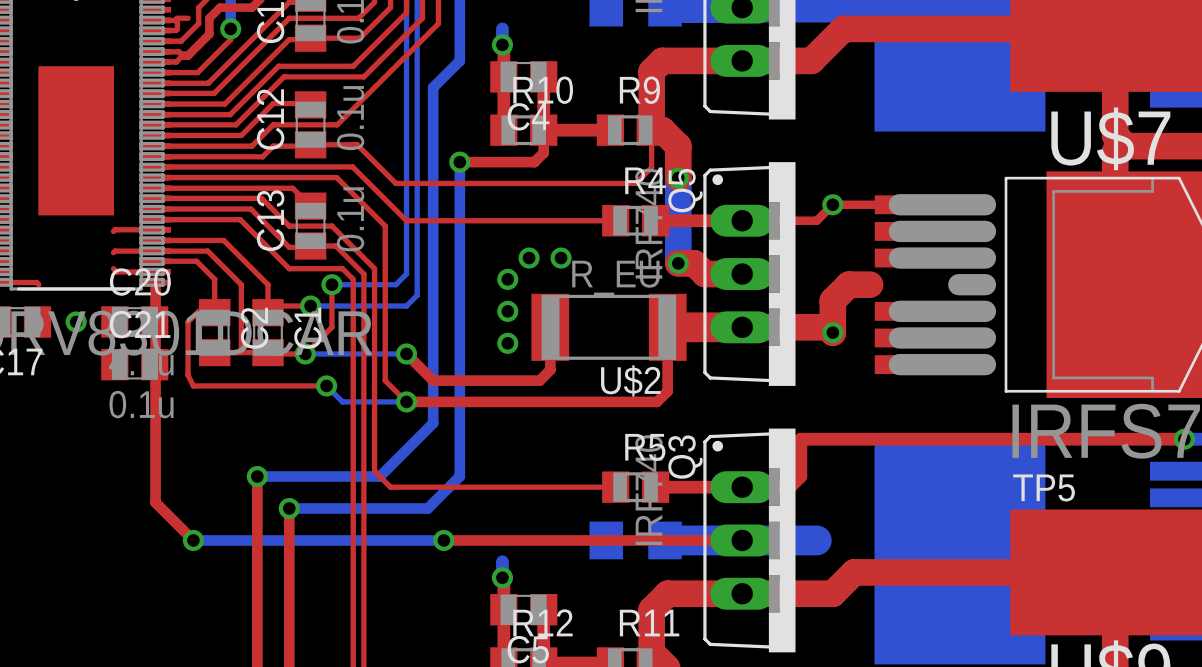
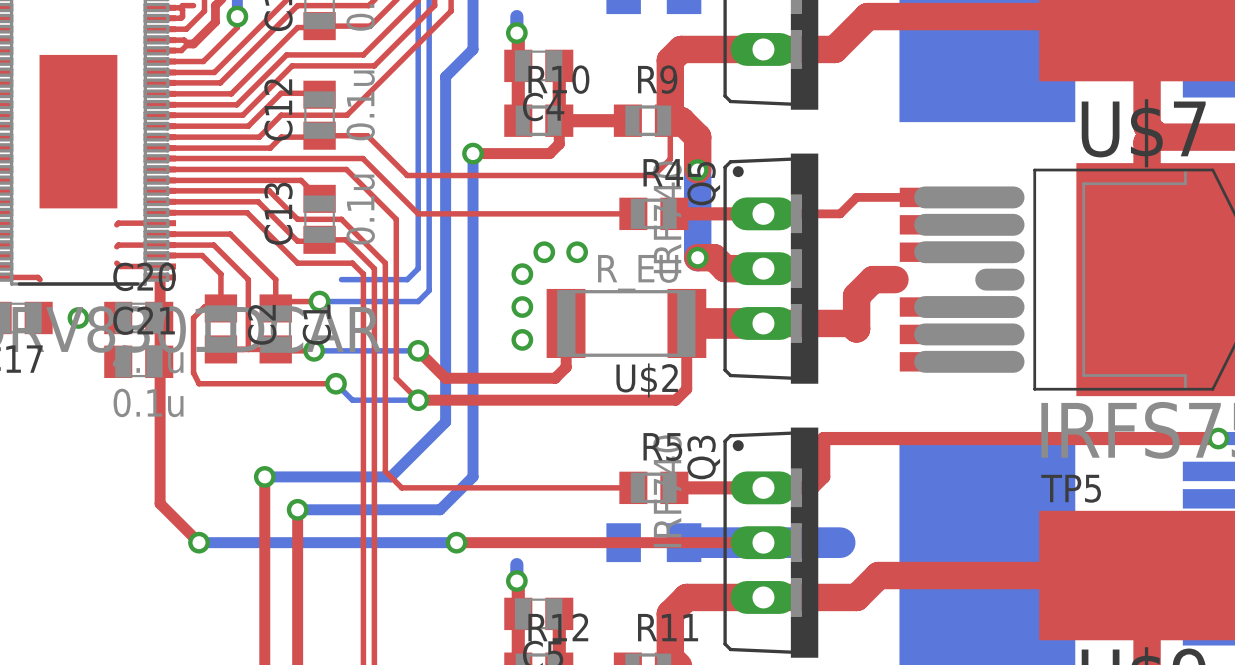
via: (832, 204) -> none
top track: (331, 284) (331, 327) (305, 353) -> none
via: (331, 284) -> none
via: (832, 332) -> none

